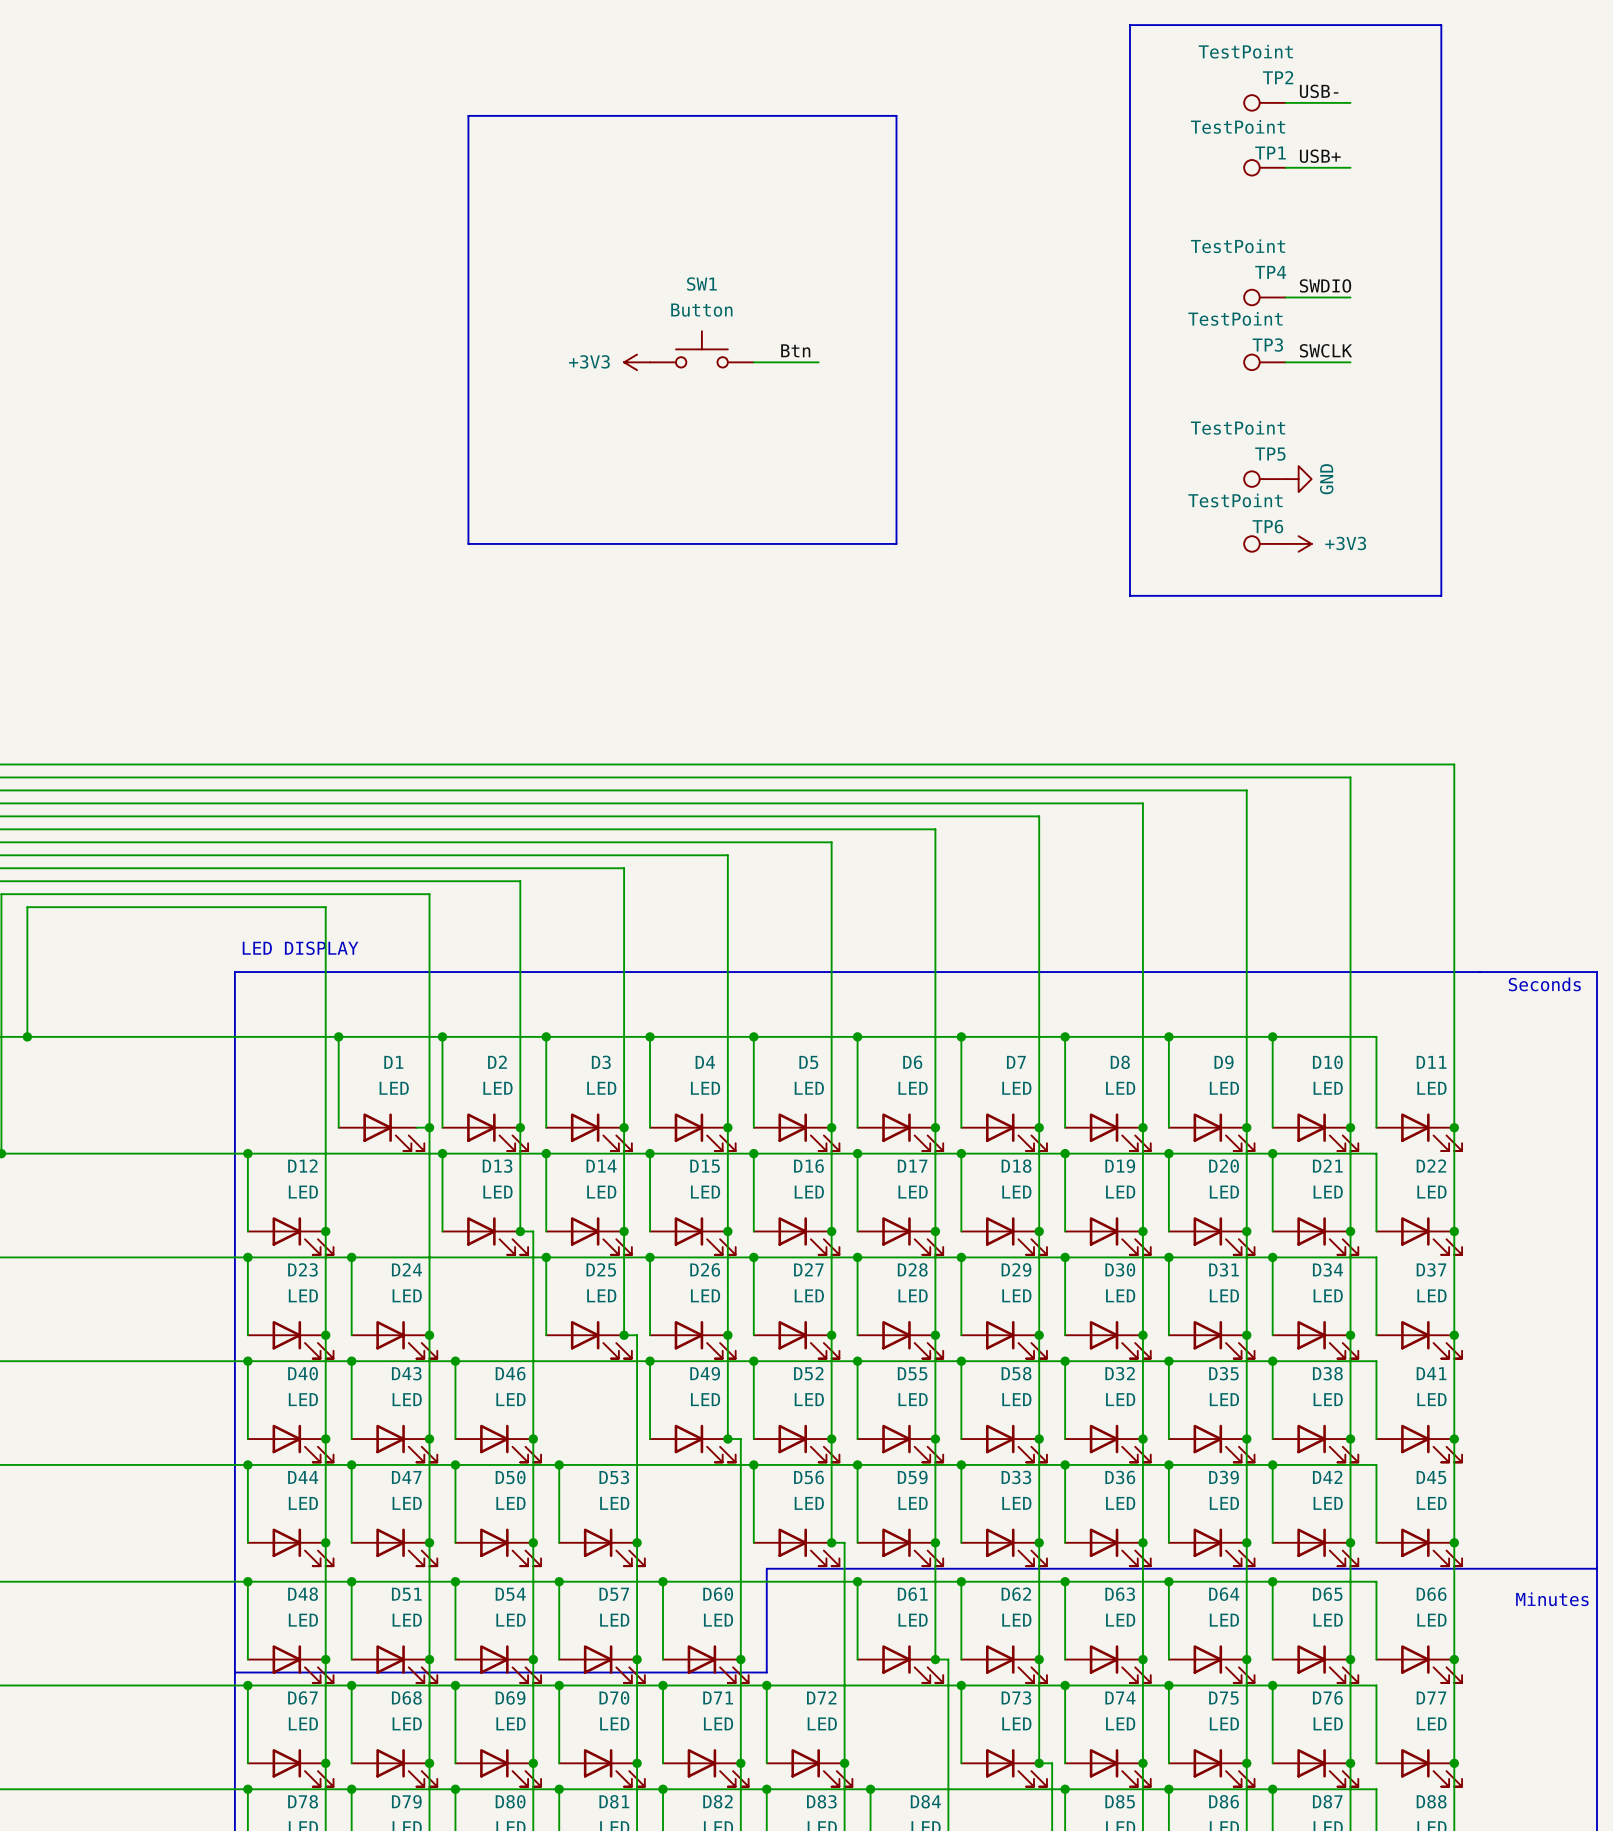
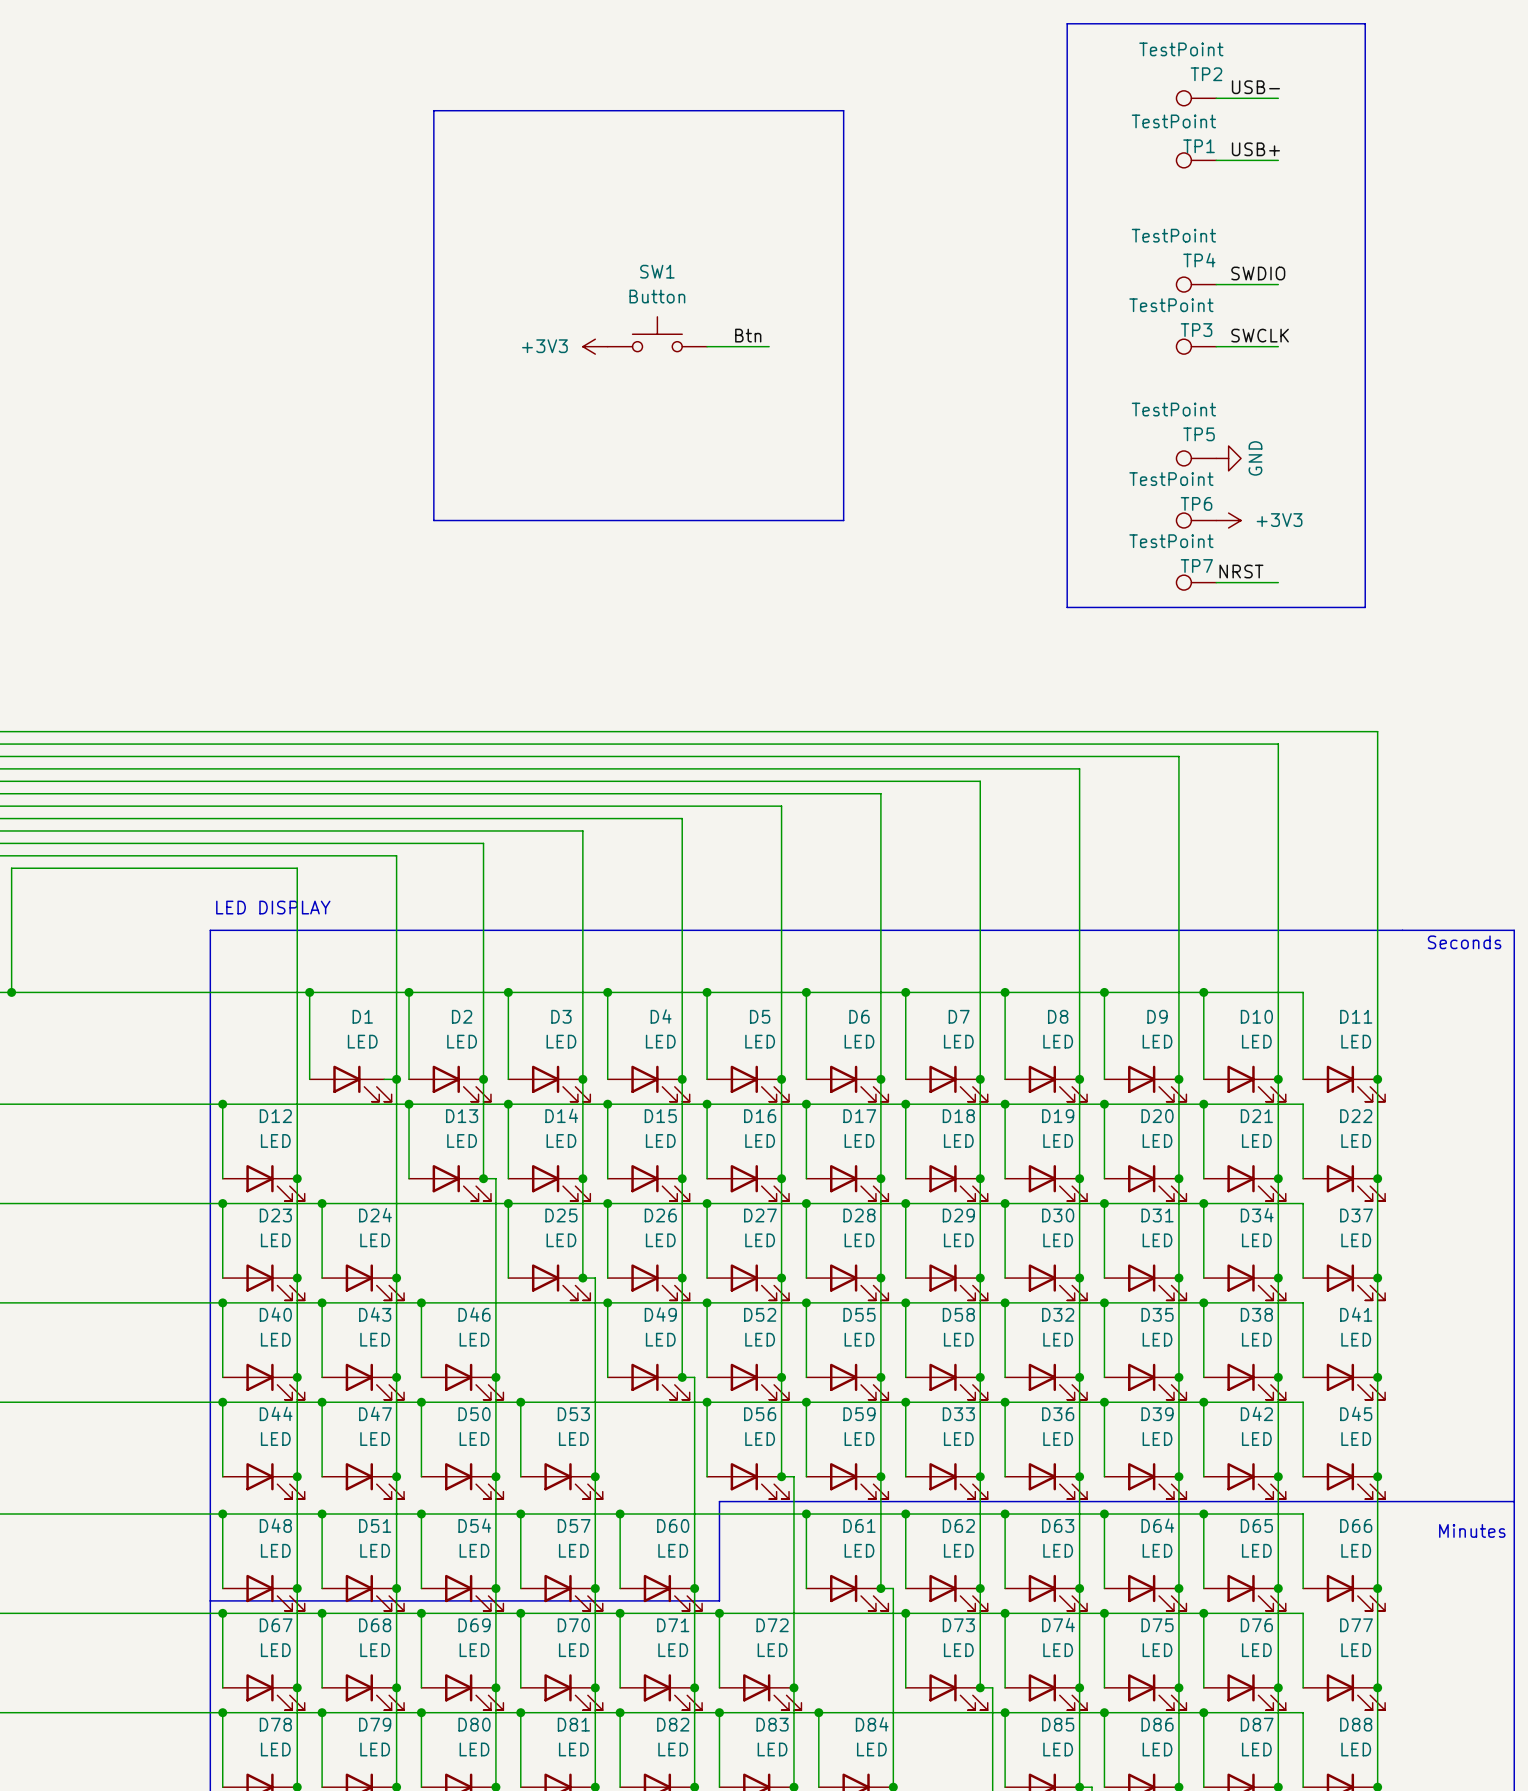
line: (1129, 595) (1441, 595) -> (1067, 570) (1067, 607) (1365, 607) (1365, 570)
label: none -> NRST (1241, 571)
TP7: none -> TestPoint (1196, 582)
wire: none -> (1216, 582) (1278, 582)

